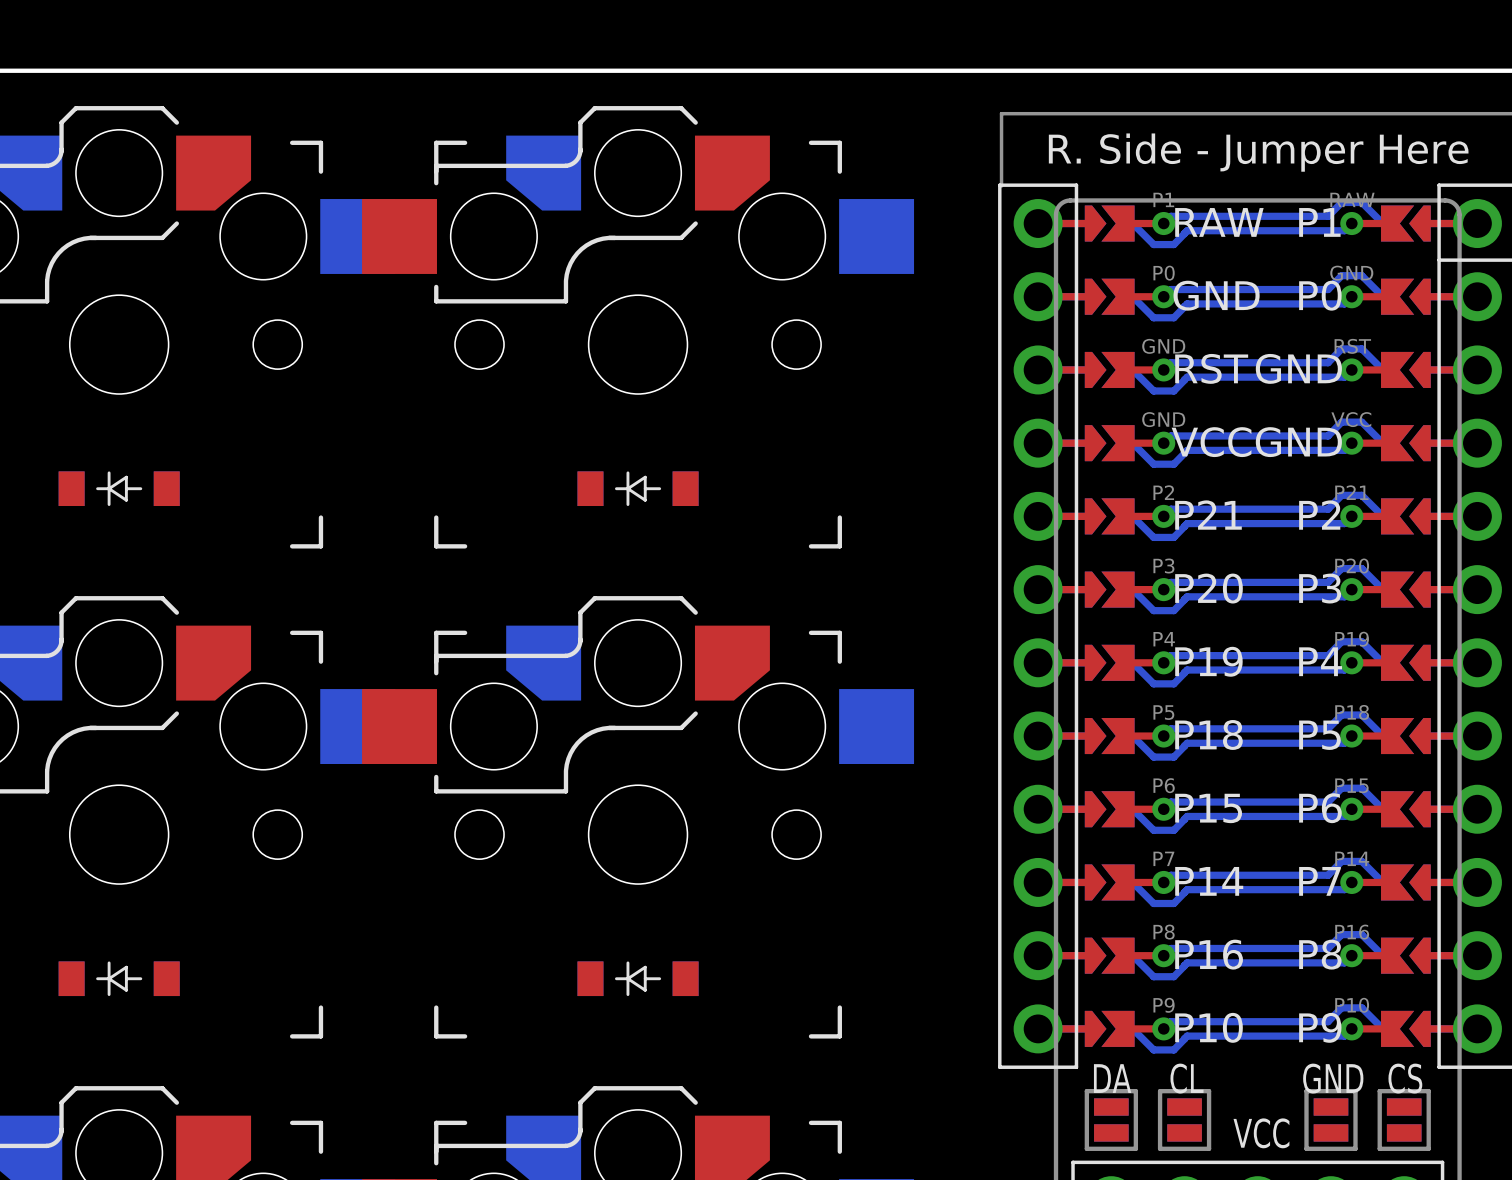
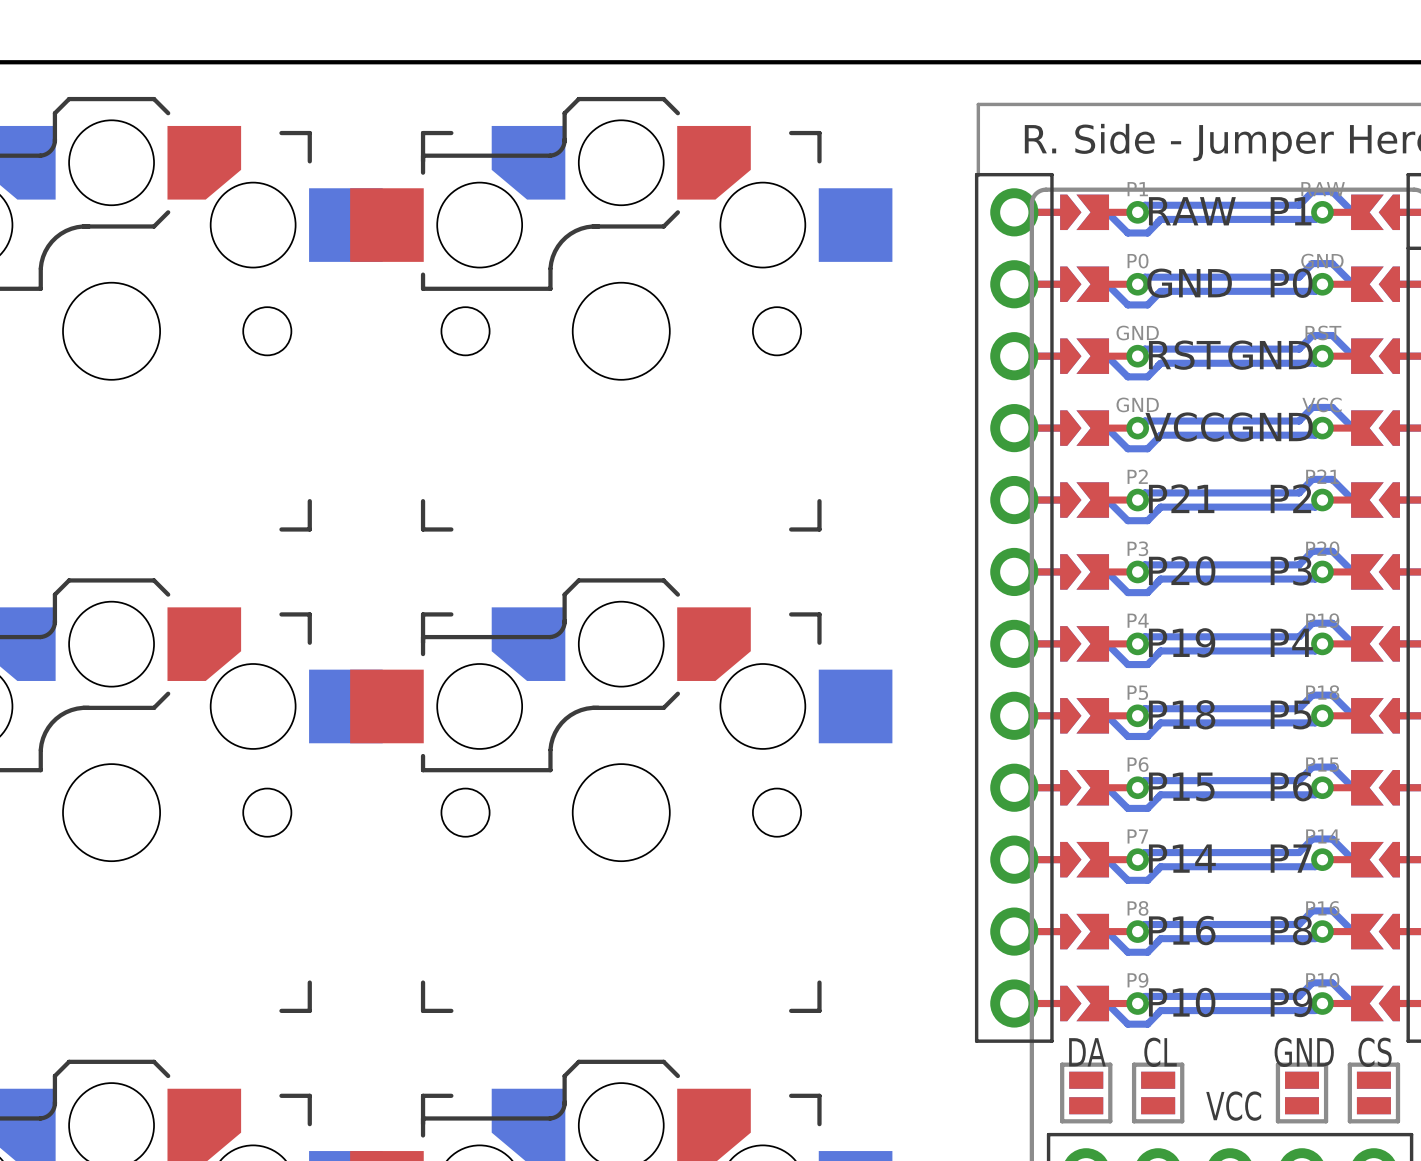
part: (119, 488) -> none
part: (638, 488) -> none
part: (119, 978) -> none
part: (638, 978) -> none

